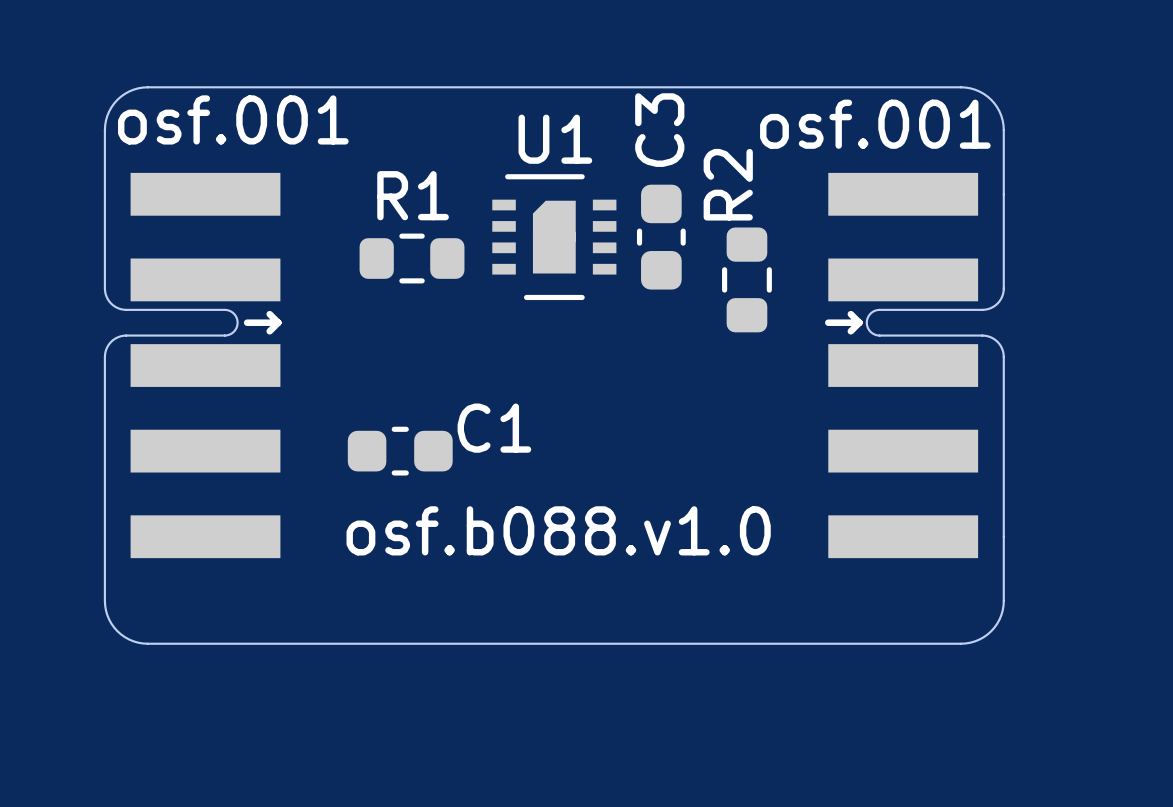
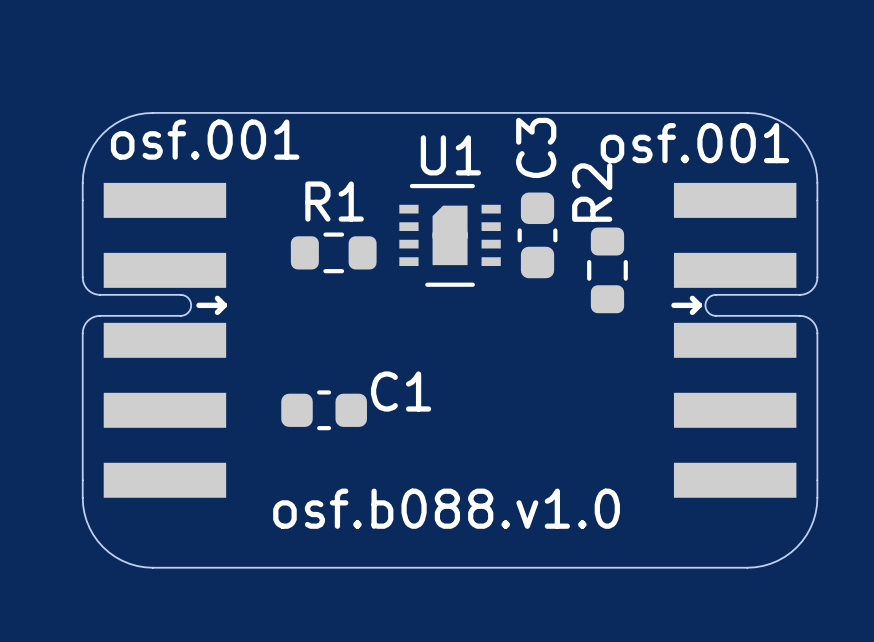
board edge: (190, 87) (138, 88) (129, 91) (117, 99) (111, 107) (105, 120) (104, 172) -> (152, 112) (129, 116) (115, 123) (103, 133) (89, 152) (84, 167) (82, 182)
board edge: (918, 87) (970, 88) (983, 93) (991, 99) (997, 107) (1002, 120) (1003, 172) -> (747, 112) (770, 116) (784, 123) (796, 133) (806, 145) (813, 159) (817, 182)
text position: osf.001 (233, 119) -> osf.001 (205, 139)
text position: osf.001 (875, 124) -> osf.001 (694, 143)
text position: osf.b088.v1.0 (558, 530) -> osf.b088.v1.0 (446, 508)
board edge: (104, 558) (105, 610) (111, 623) (117, 631) (124, 637) (138, 642) (190, 643) -> (82, 497) (86, 520) (93, 534) (103, 547) (115, 557) (129, 563) (152, 567)
board edge: (1003, 558) (1002, 610) (999, 619) (991, 631) (983, 637) (970, 642) (918, 643) -> (817, 497) (813, 520) (806, 534) (796, 547) (777, 560) (762, 565) (747, 567)

